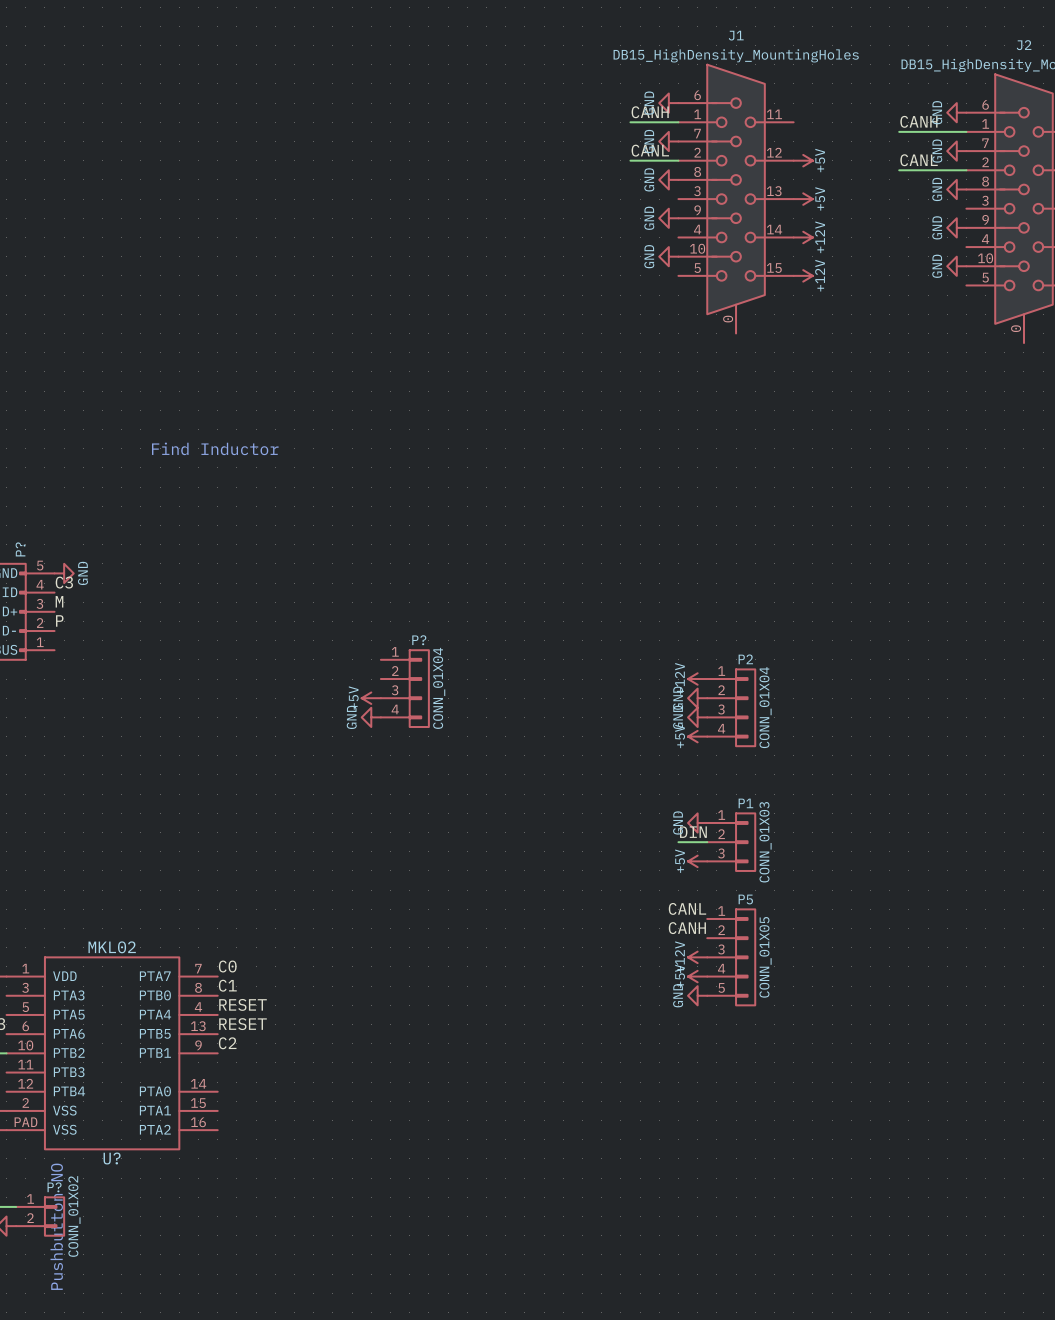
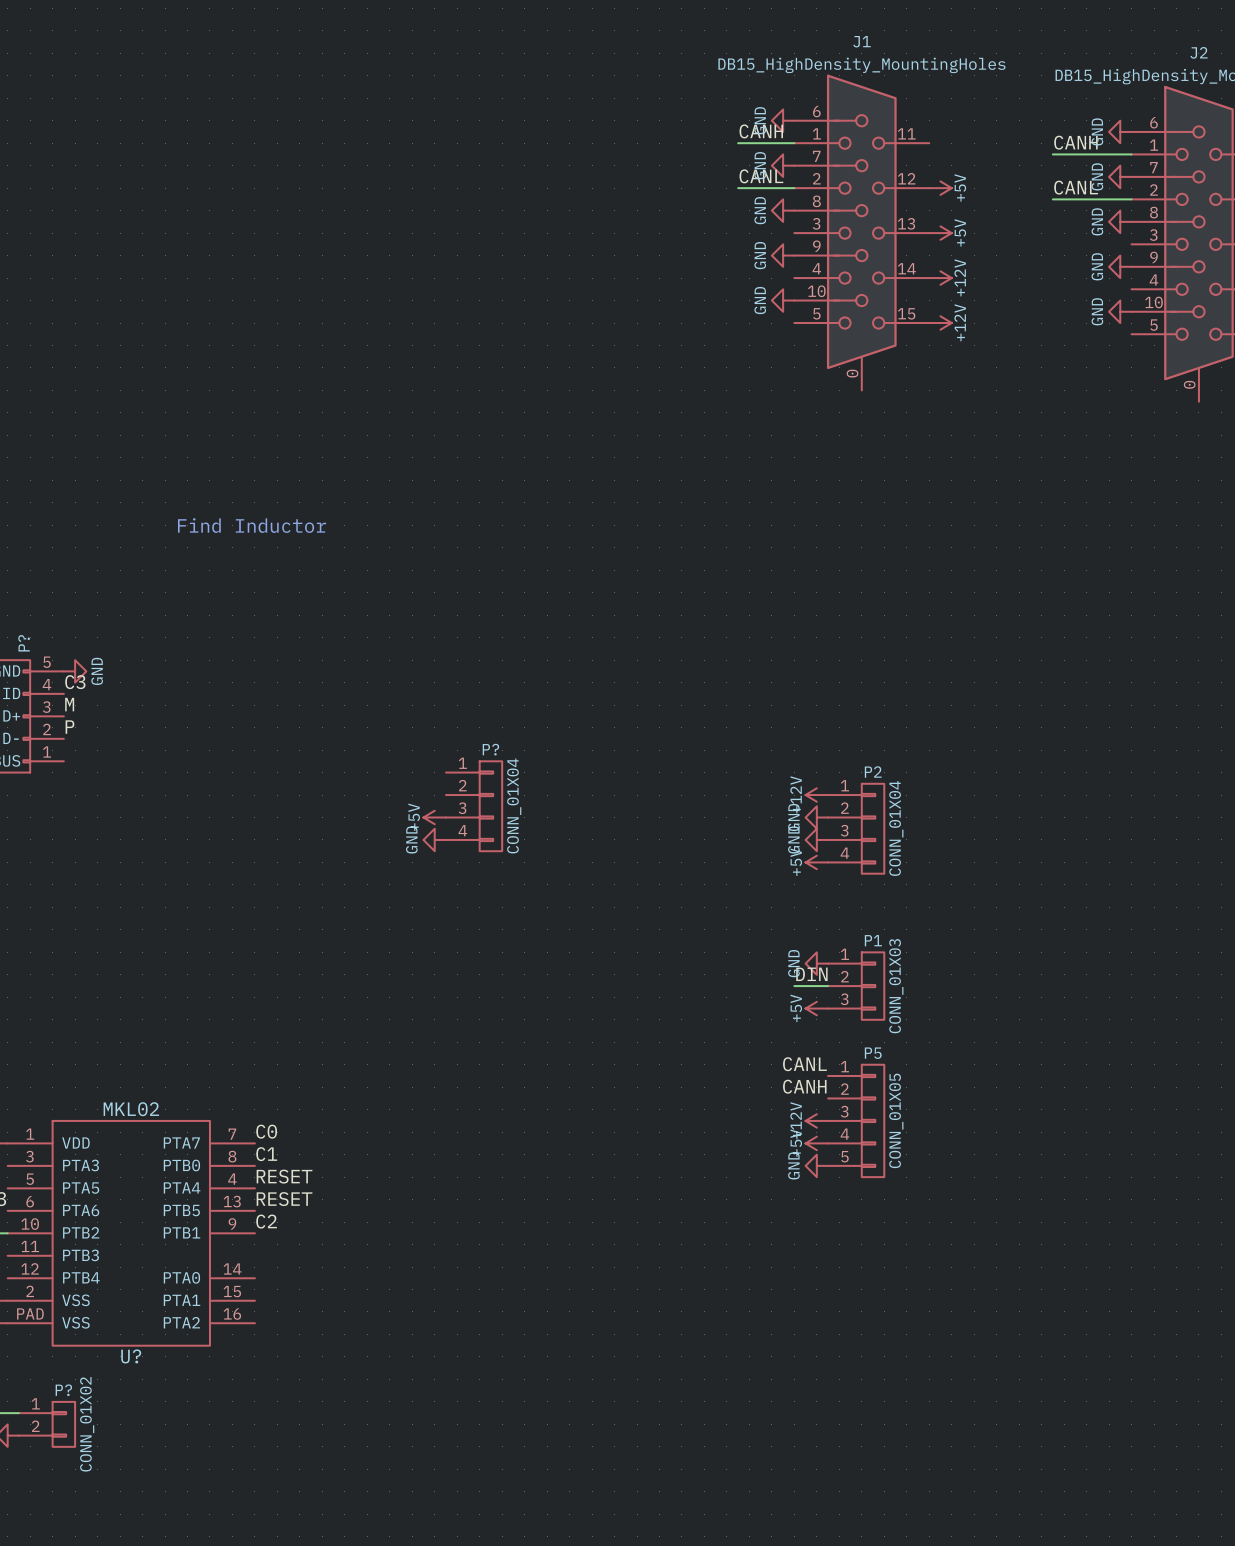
text: Pushbutton NO (56, 1226) -> none

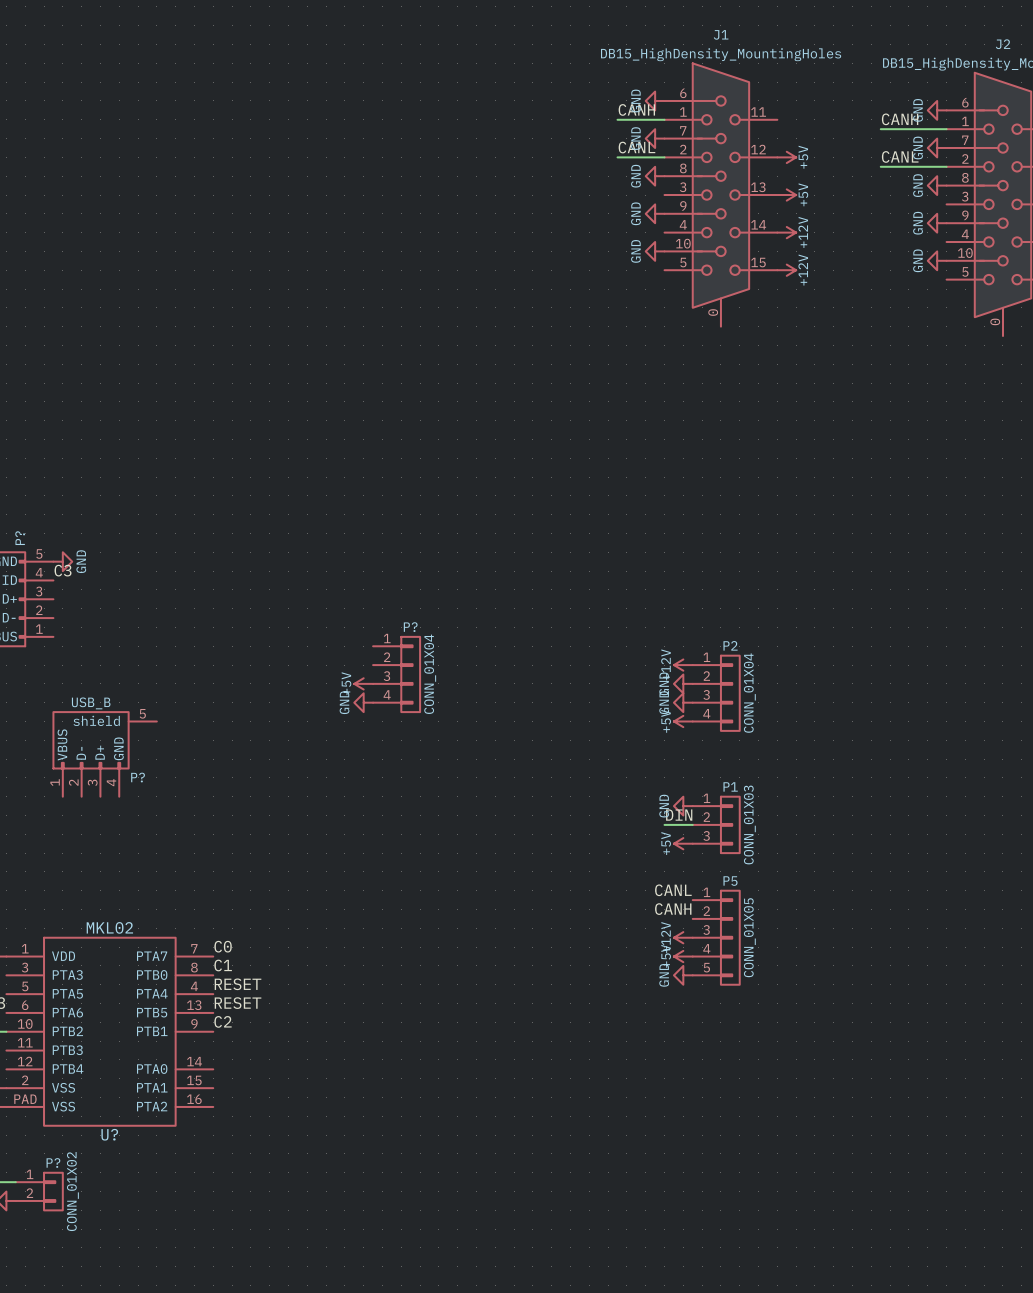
text: Find Inductor (252, 525) -> none
label: M (69, 704) -> none
label: P (69, 727) -> none
P?: none -> USB_B (105, 754)

